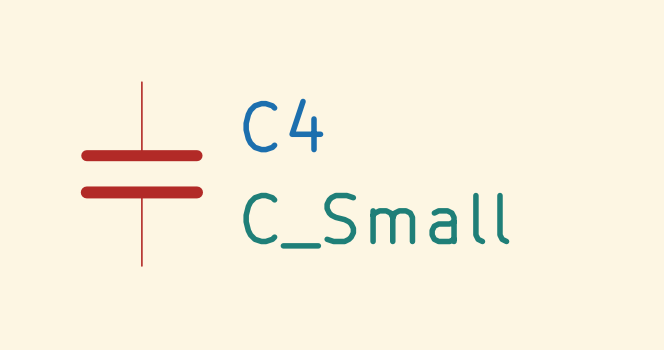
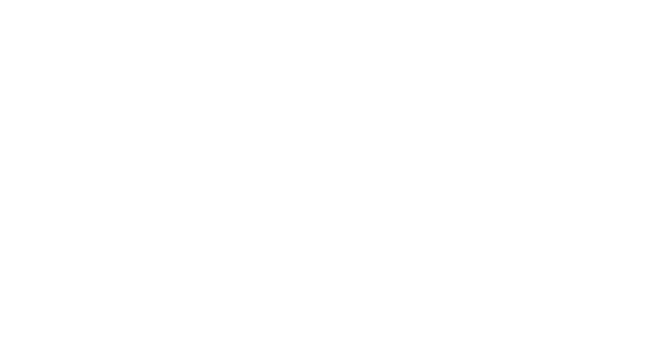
C4: C_Small (141, 174) -> none

